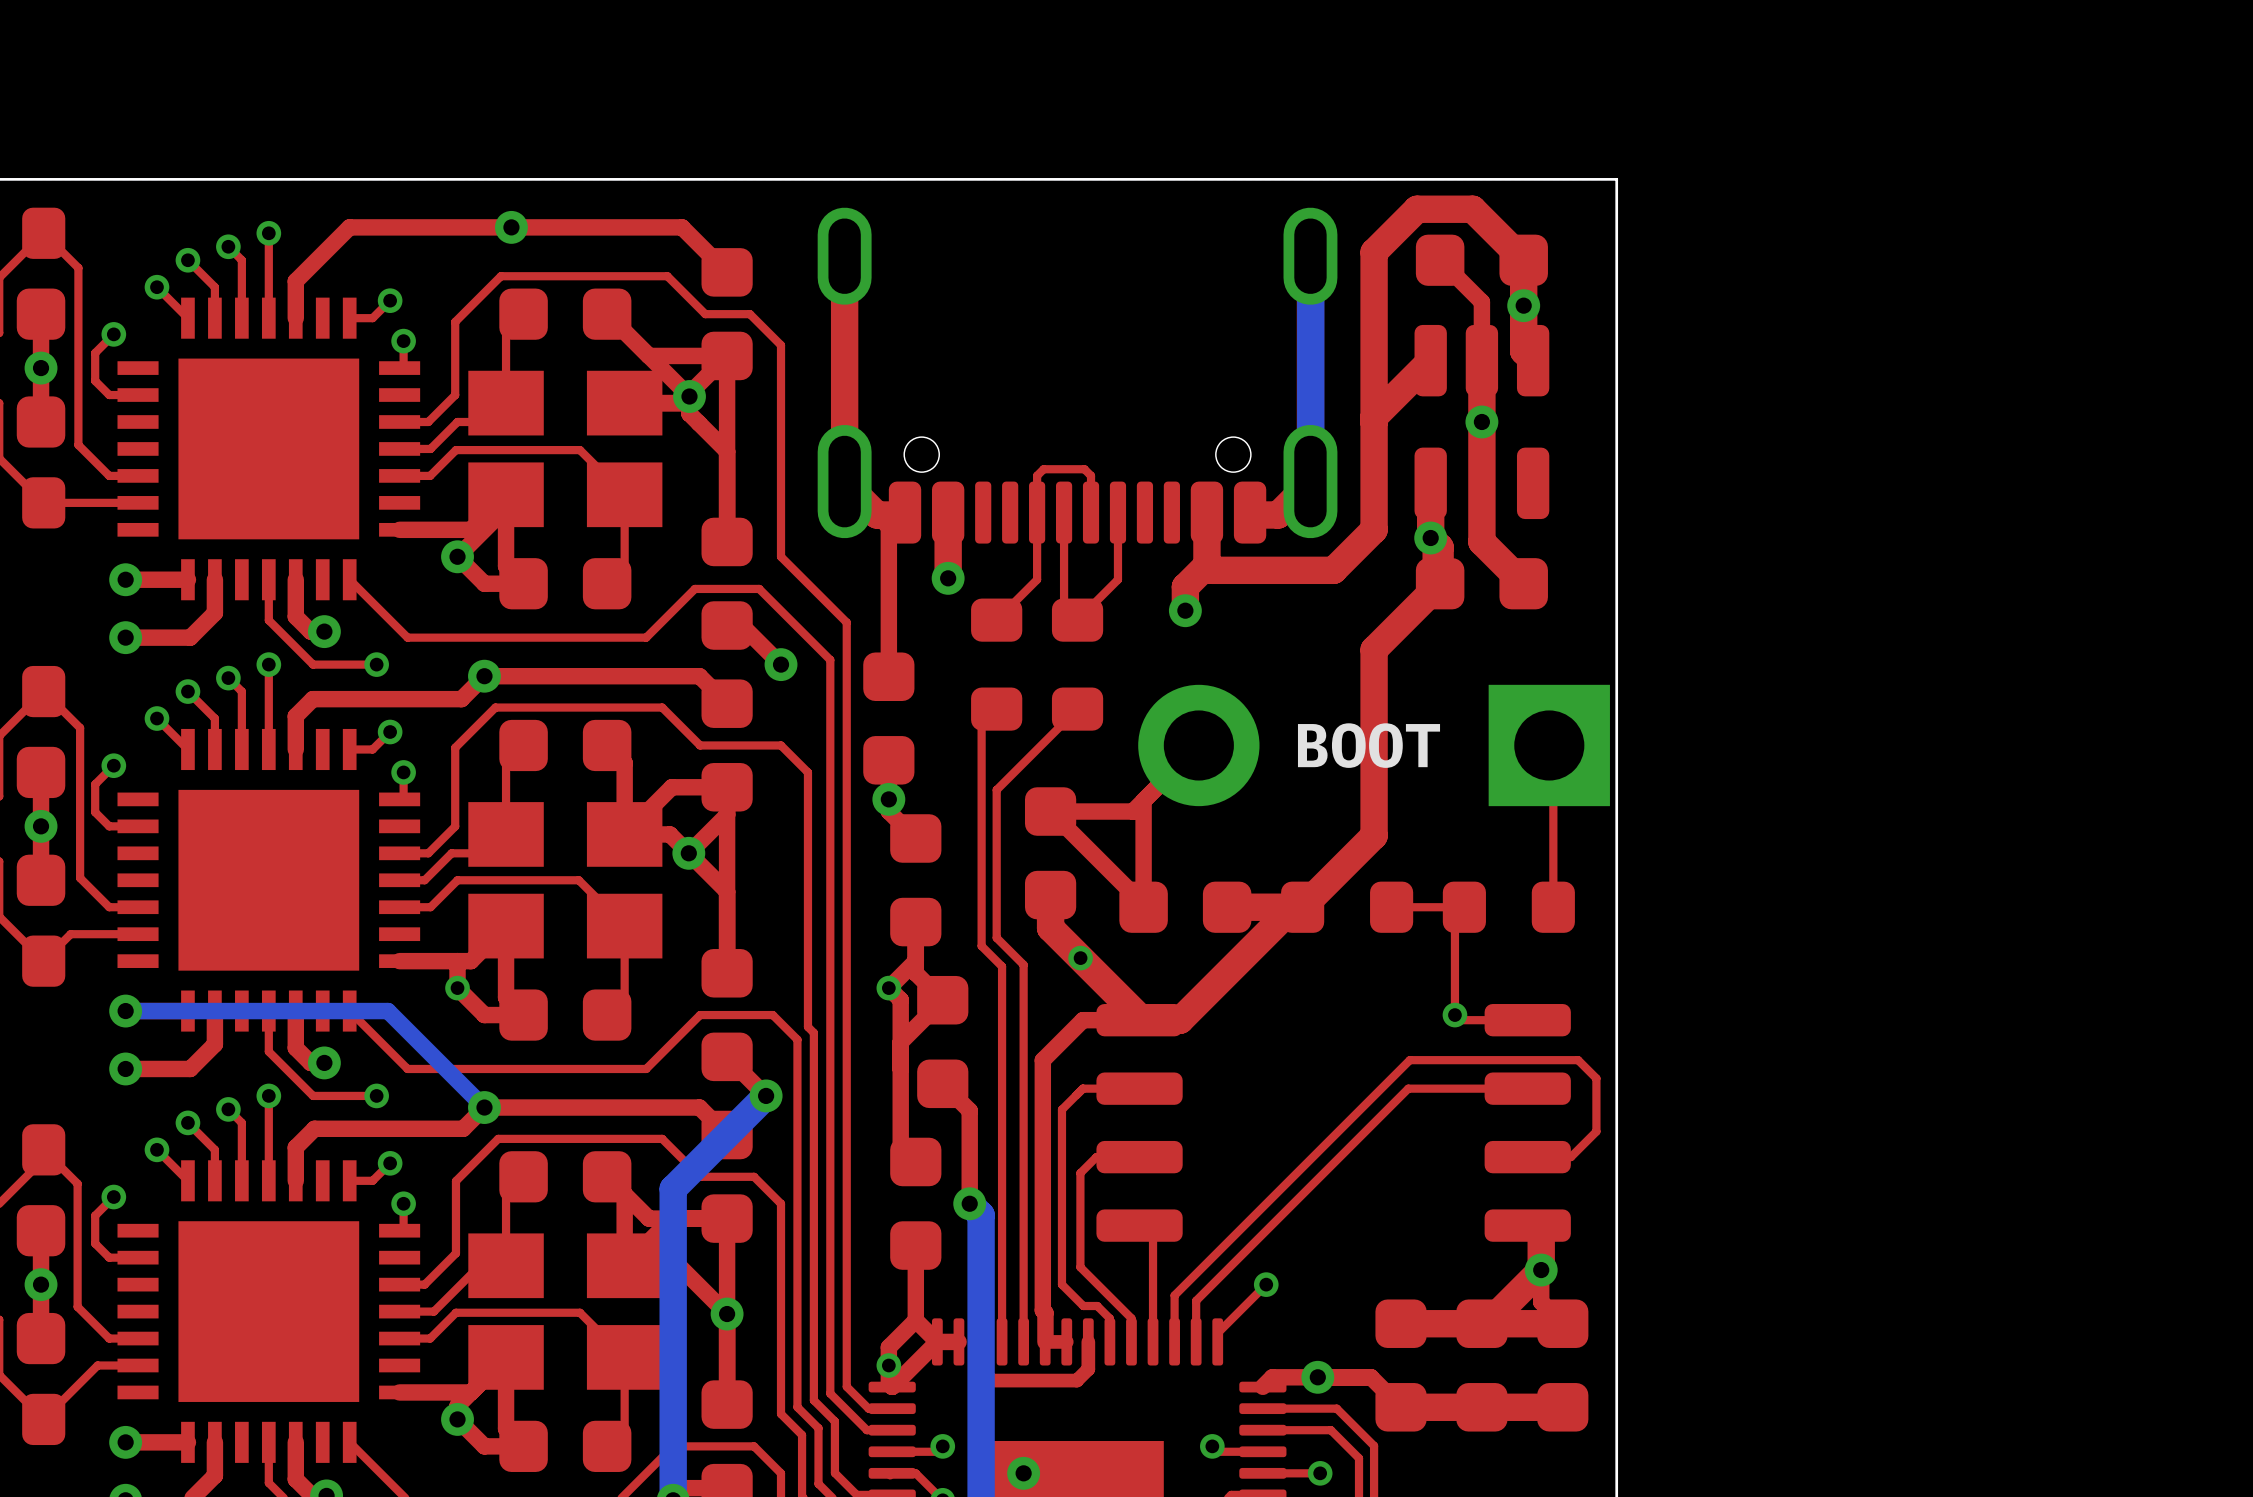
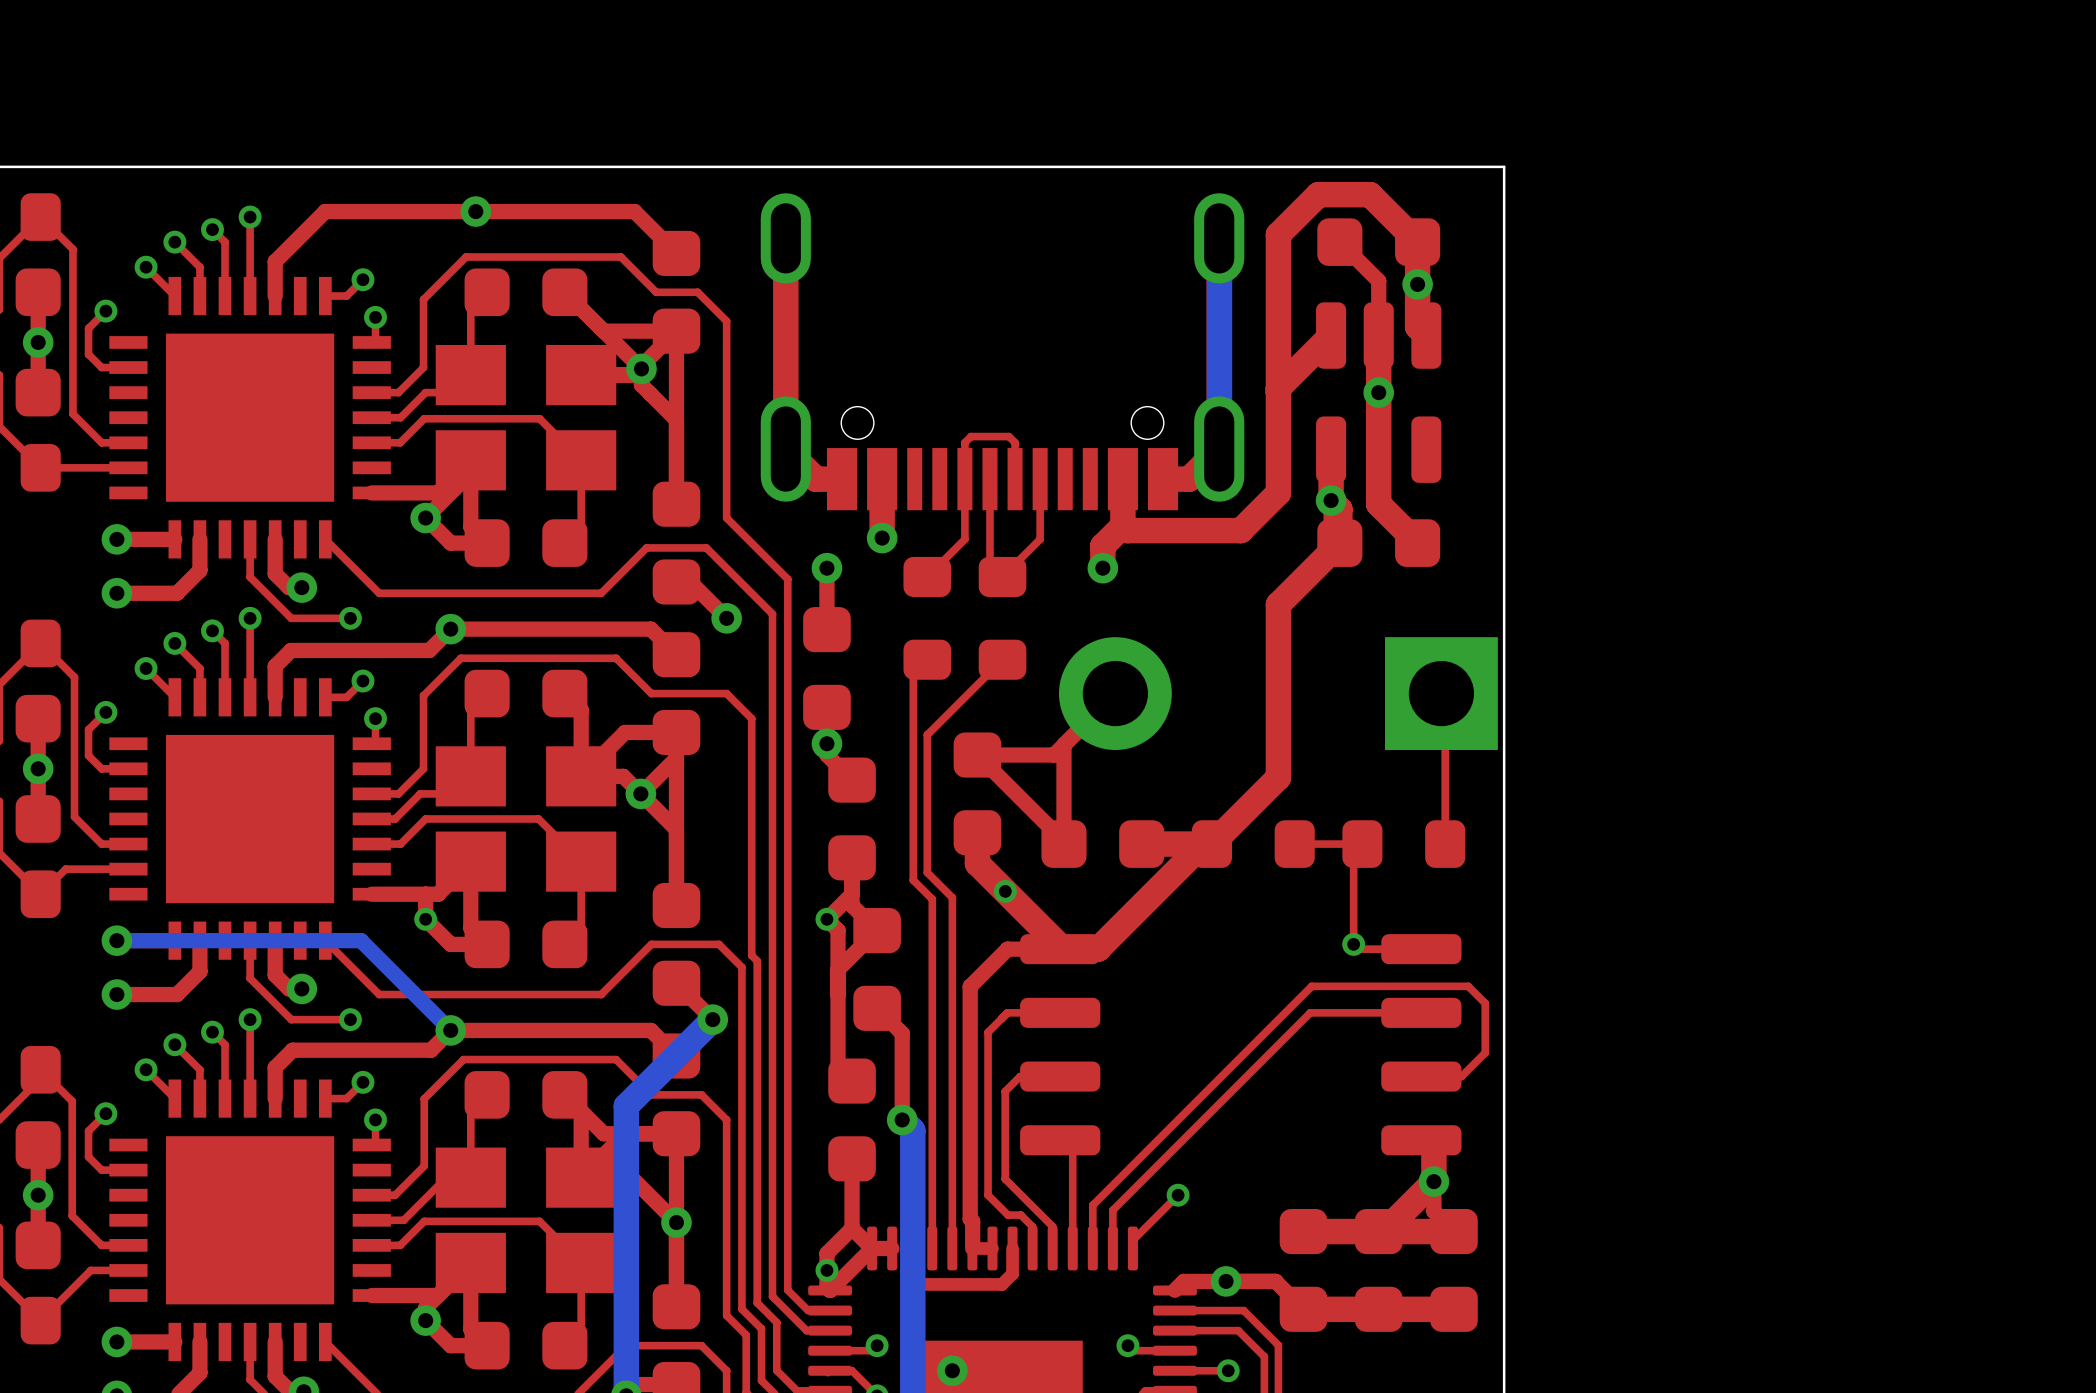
part footprint: [817, 207, 1338, 544] -> [760, 193, 1245, 511]
top track: (844, 482) (888, 526) (888, 610) -> none
via: none -> (826, 568)
text: BOOT (1369, 745) -> none

